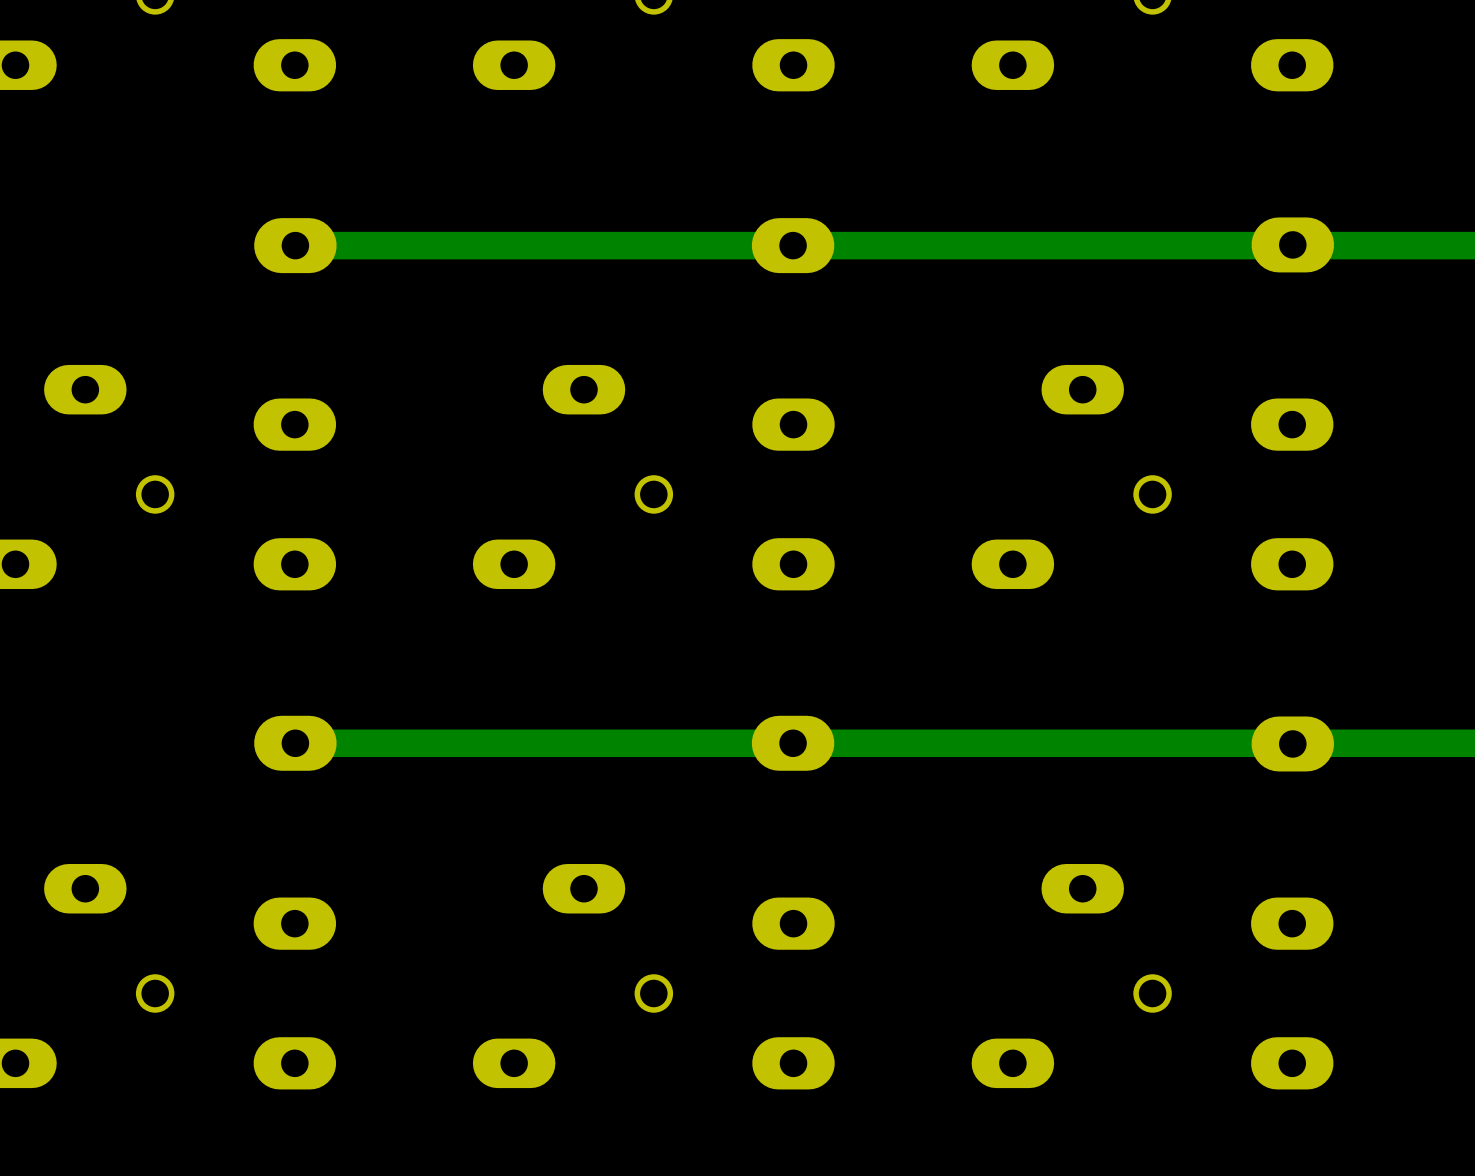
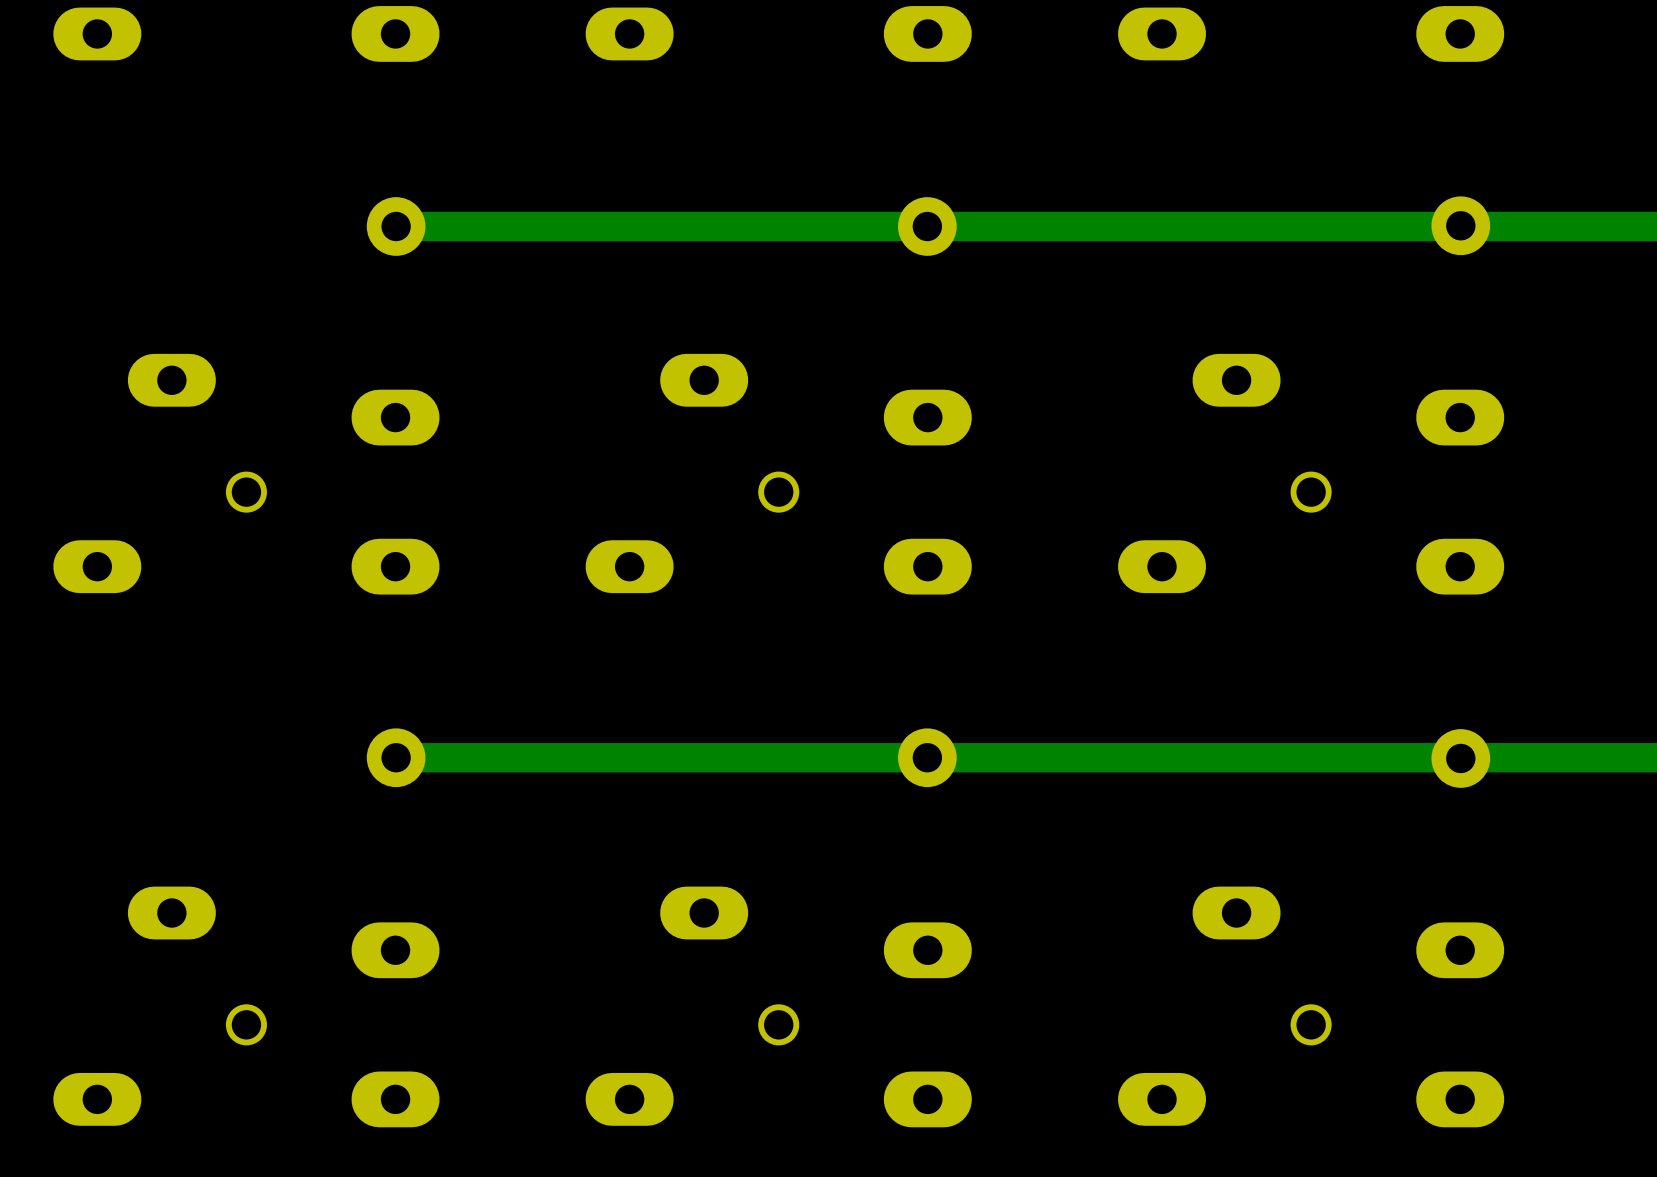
part footprint: [1251, 217, 1335, 273] -> [1431, 196, 1491, 256]
part footprint: [254, 218, 337, 274] -> [366, 197, 426, 256]
part footprint: [751, 218, 835, 274] -> [898, 197, 957, 256]
part footprint: [254, 715, 337, 771] -> [366, 728, 426, 788]
part footprint: [751, 715, 835, 771] -> [898, 728, 957, 788]
part footprint: [1251, 716, 1335, 772] -> [1431, 729, 1491, 788]

